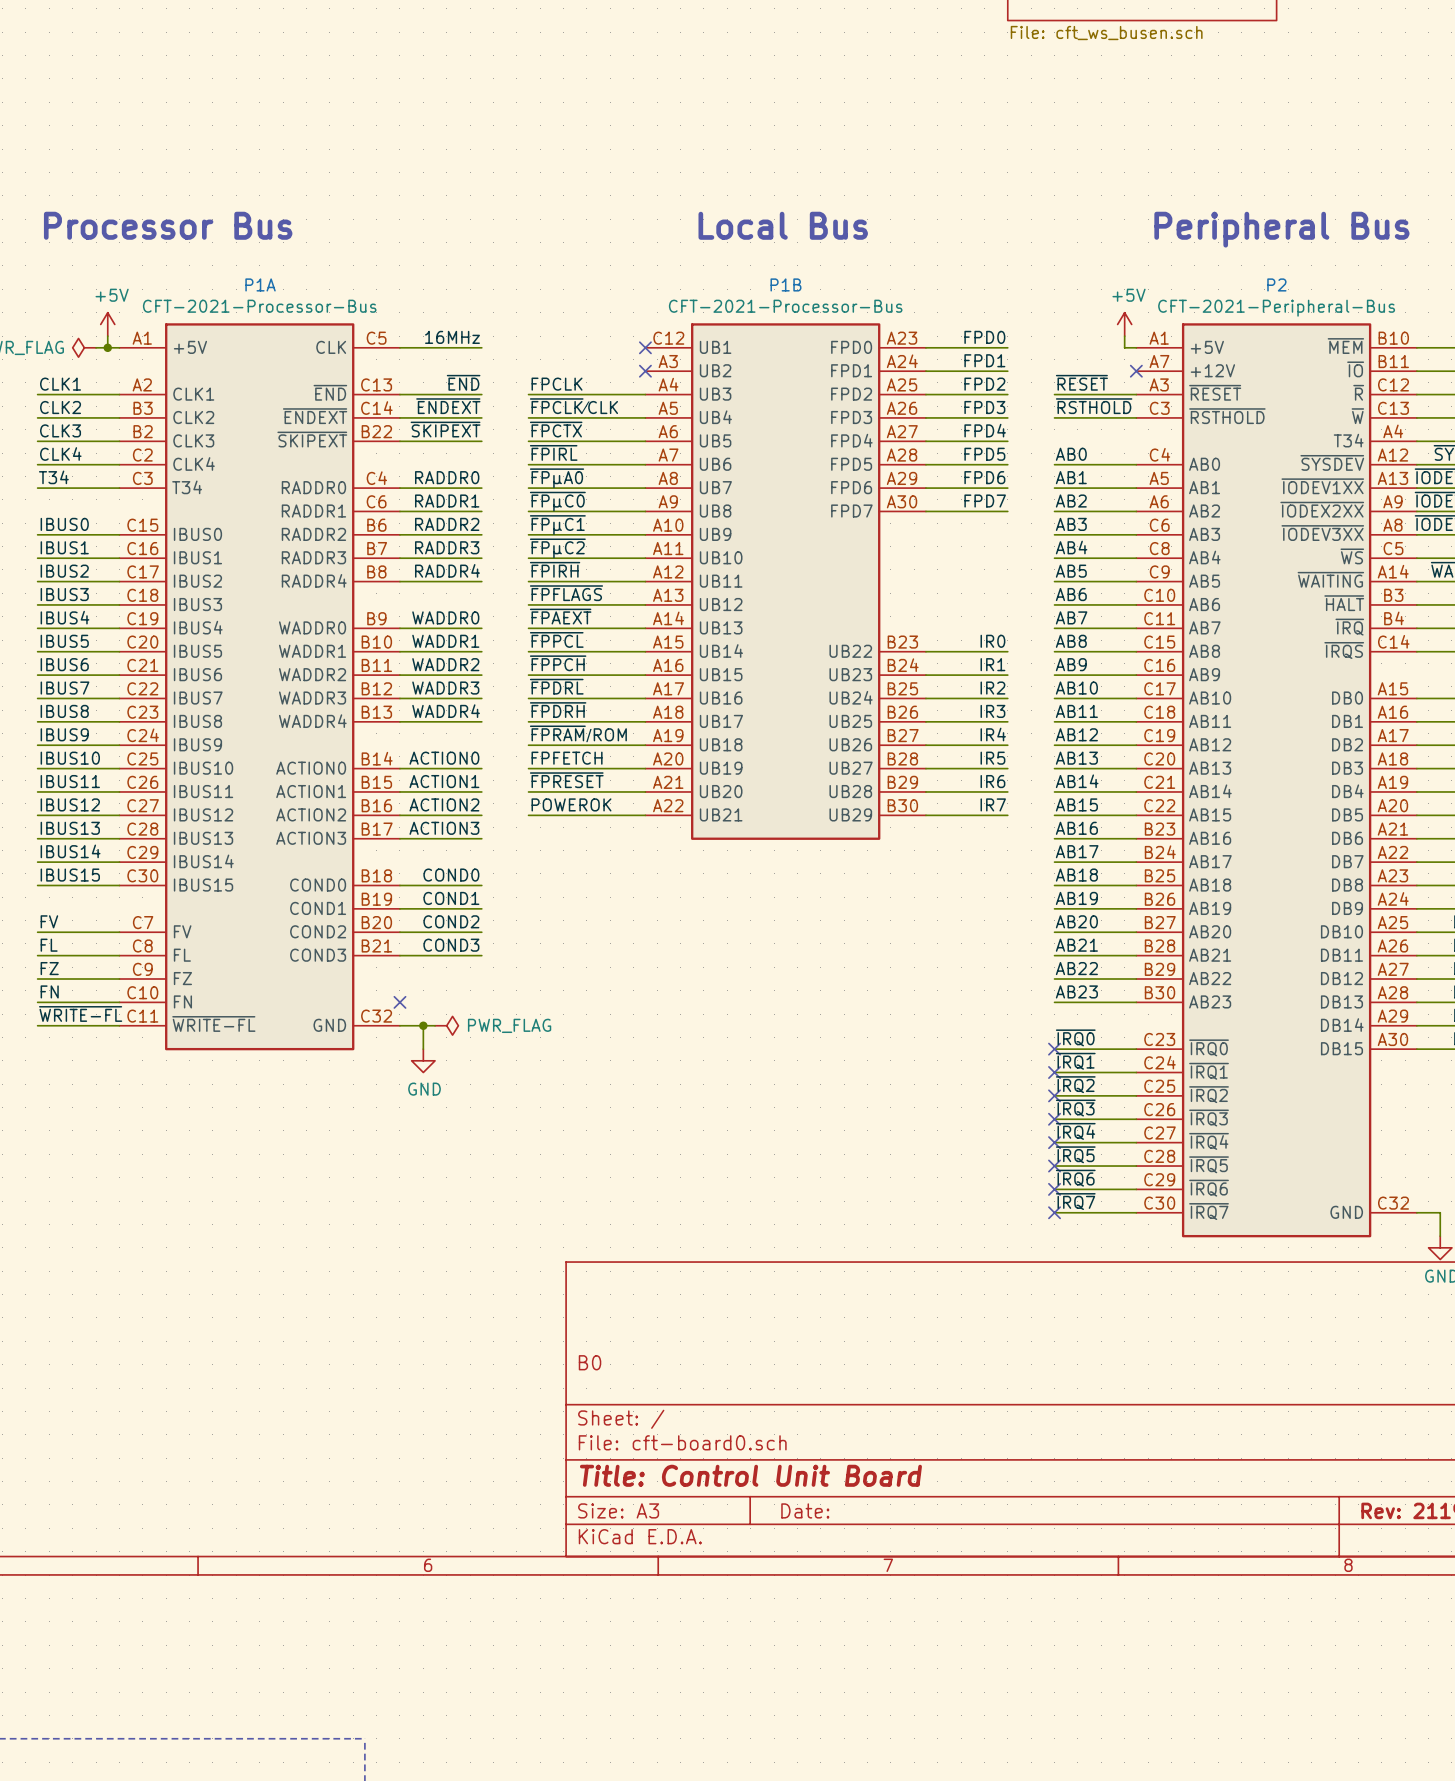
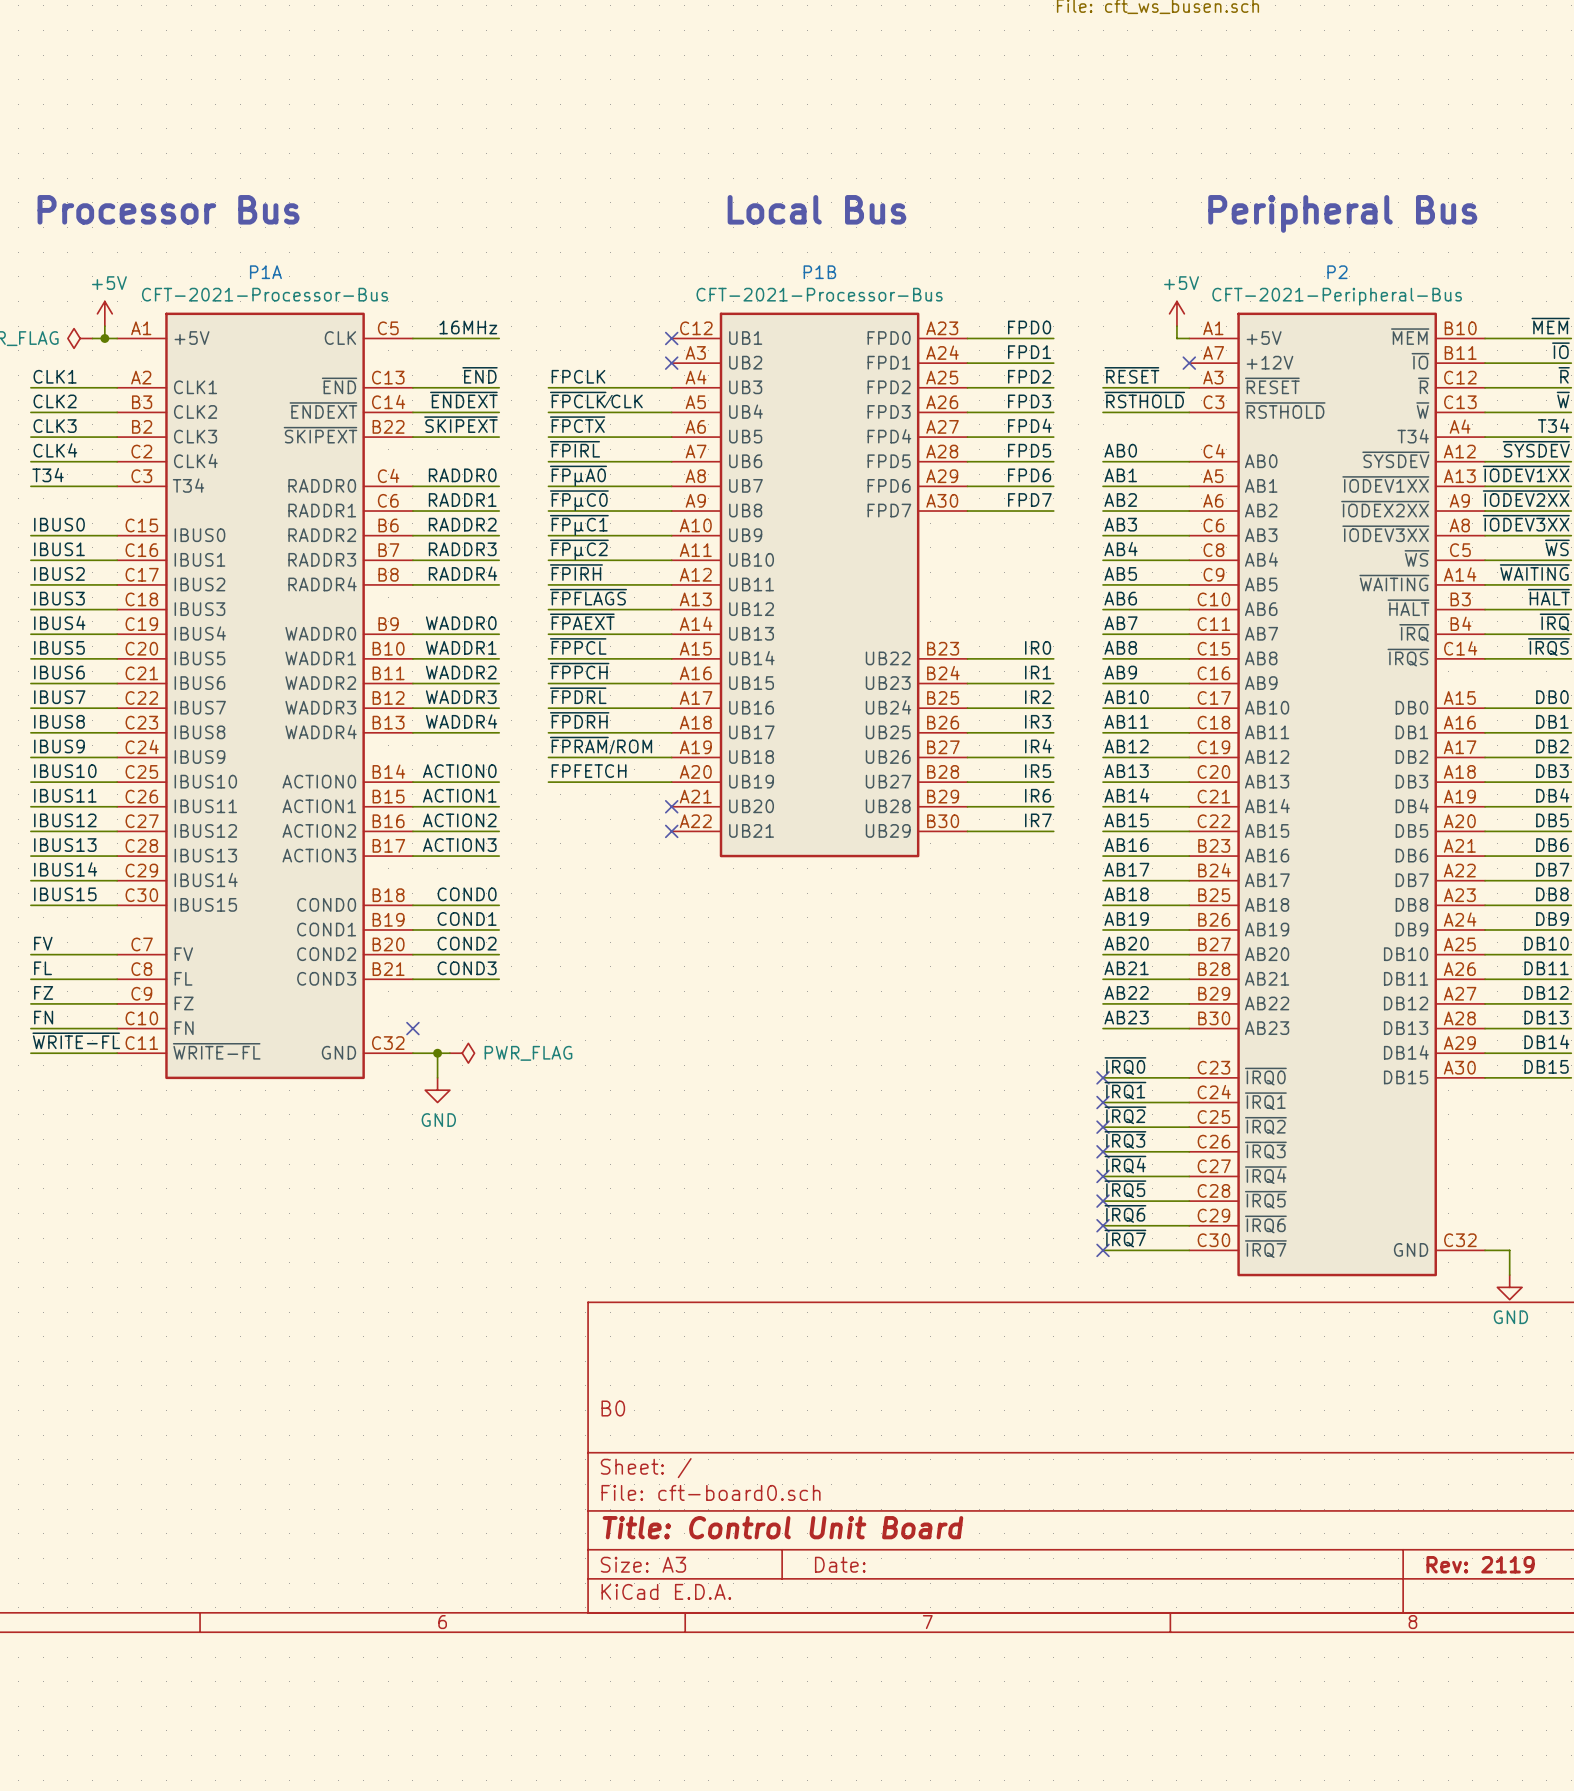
label: ~{FPRESET} (566, 780) -> none
wire: (528, 791) (645, 791) -> none
no-connect mark: none -> (671, 806)
label: POWEROK (571, 804) -> none
wire: (528, 815) (645, 815) -> none
no-connect mark: none -> (671, 831)

